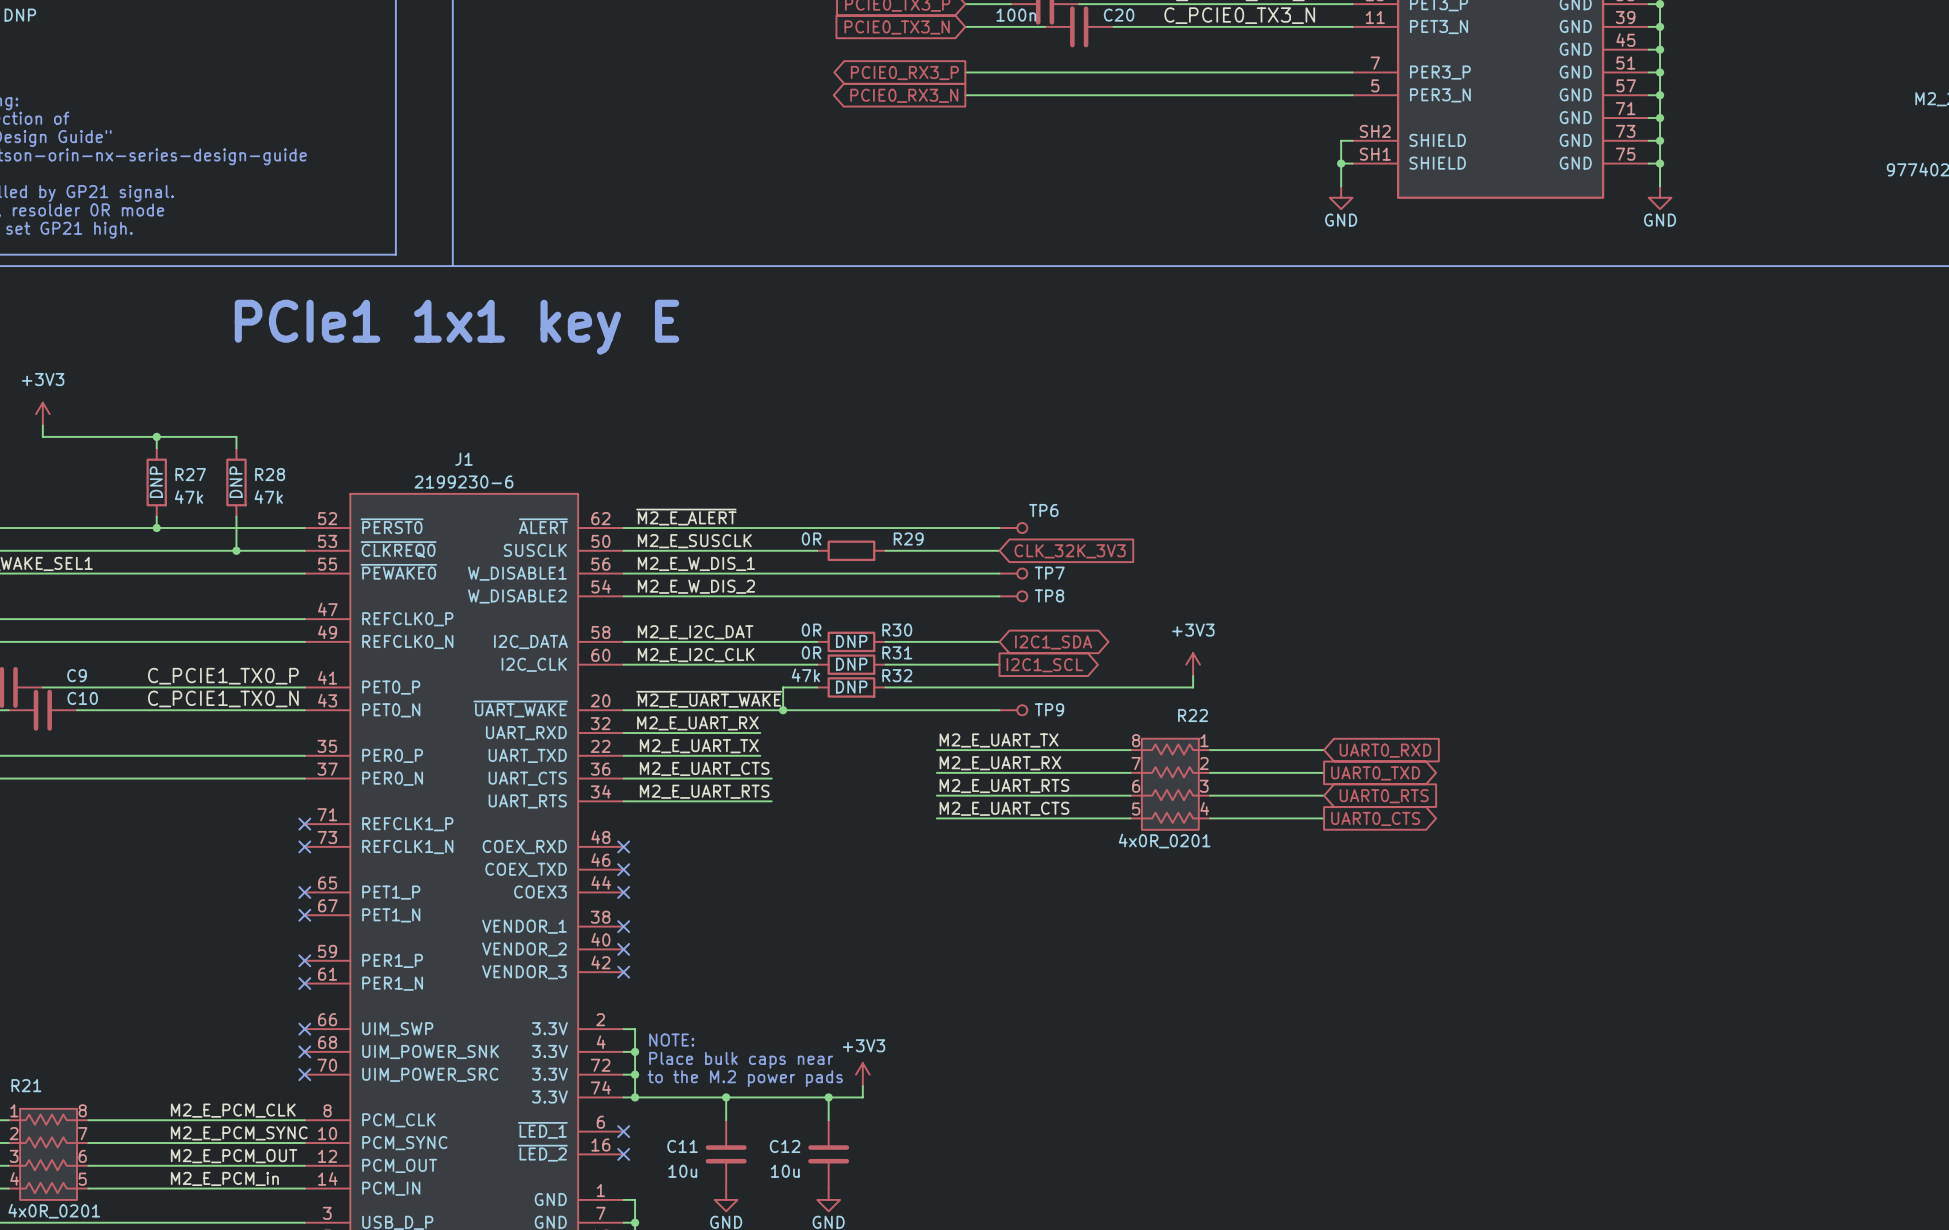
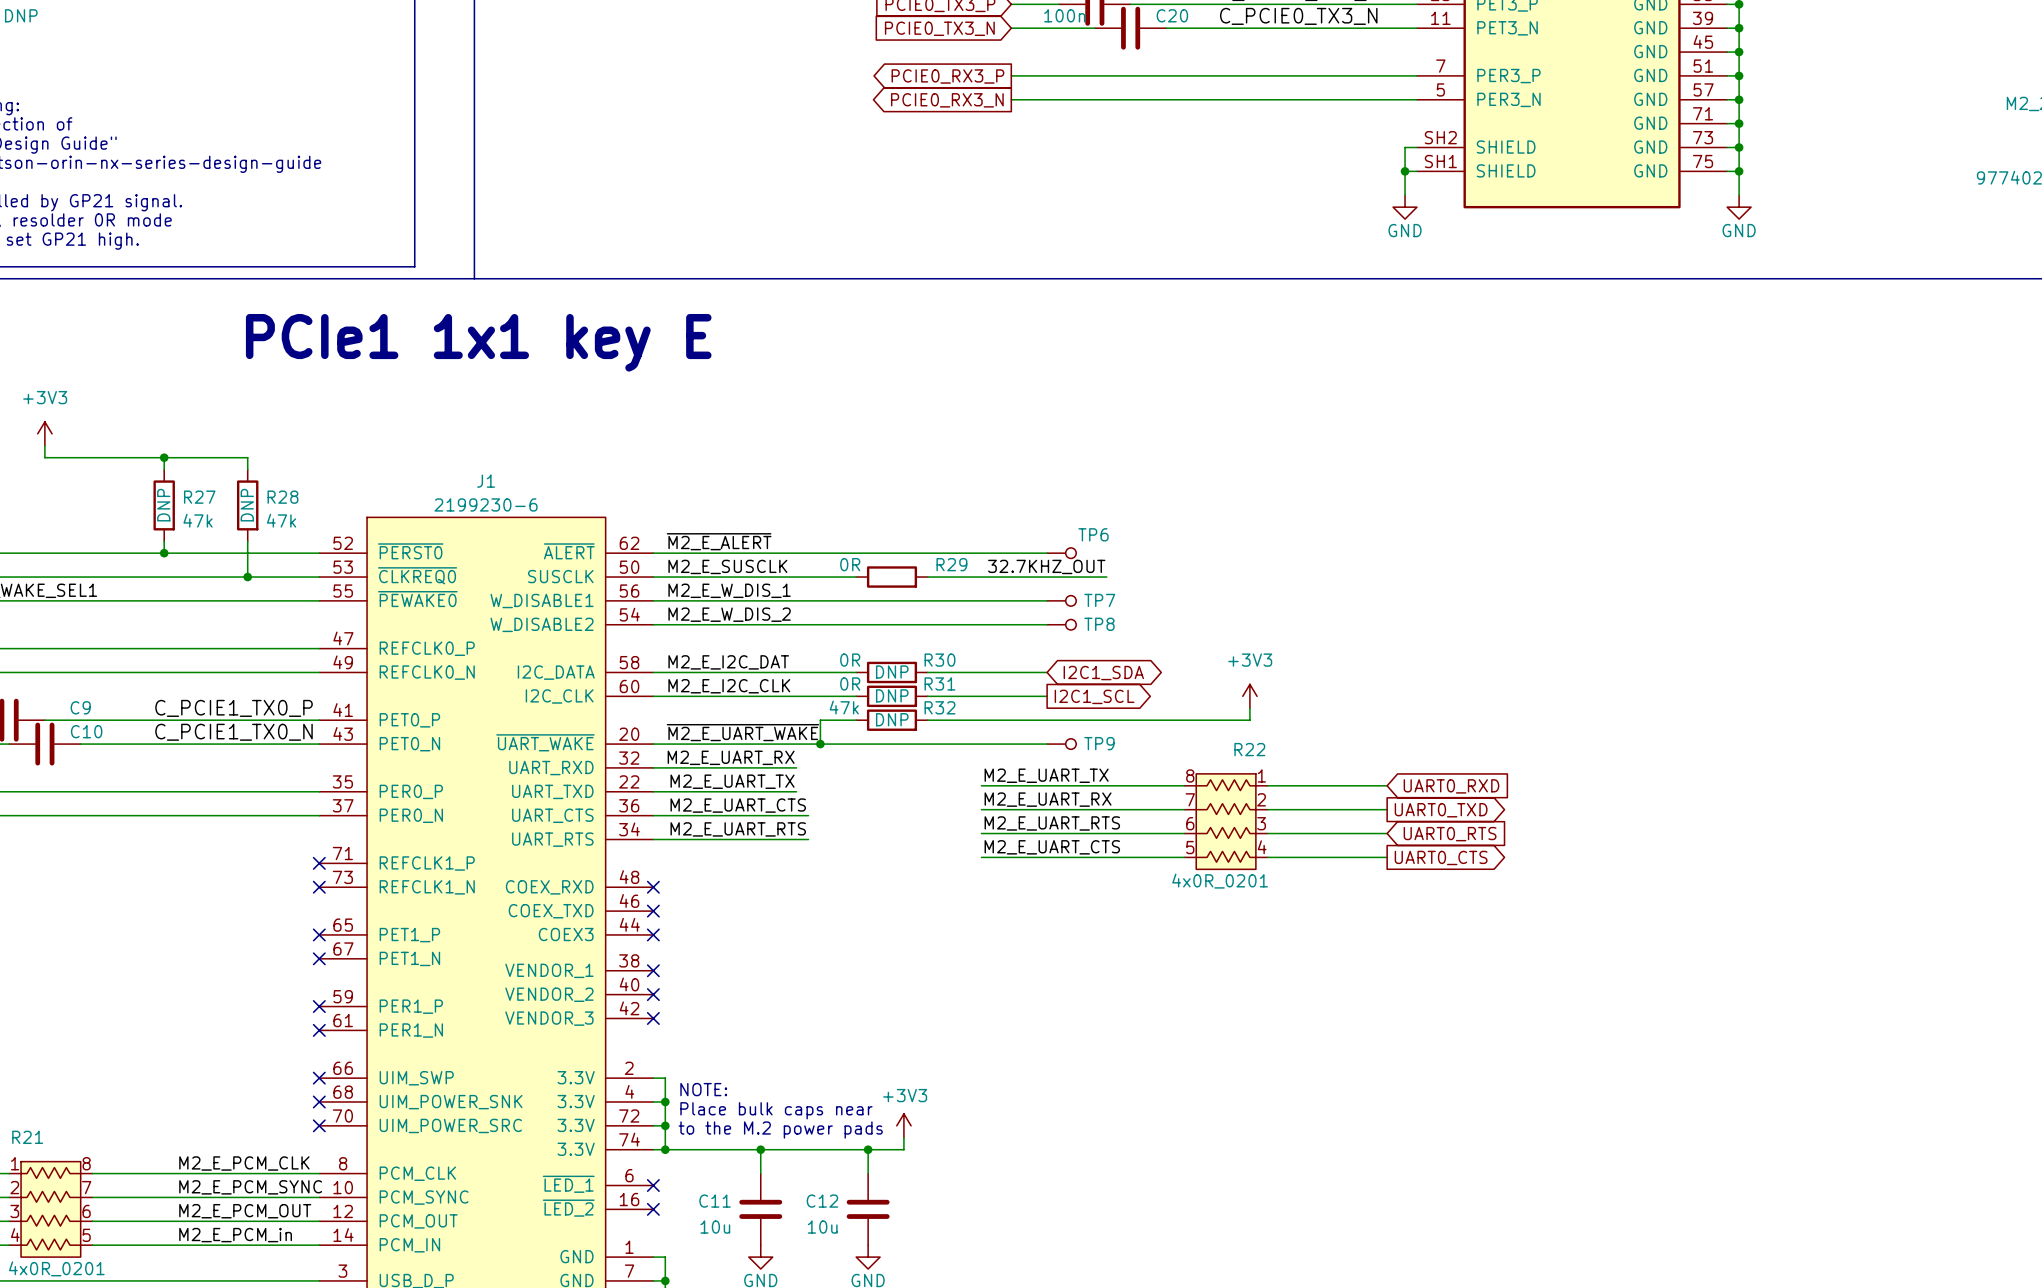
label: none -> 32.7KHZ_OUT (1046, 566)
wire: none -> (1047, 577) (1106, 577)
global label: CLK_32K_3V3 (1070, 551) -> none

